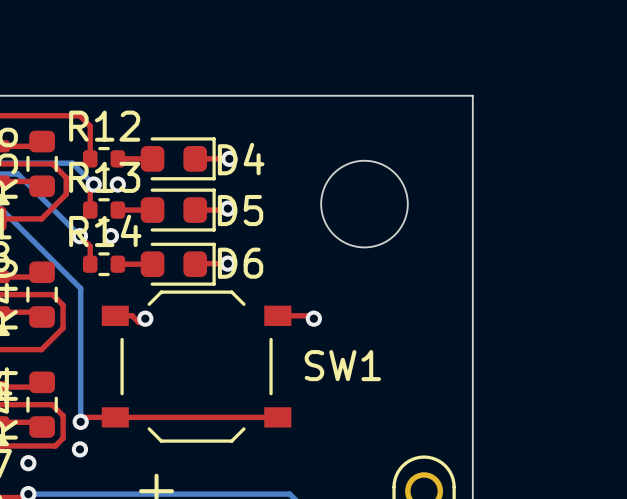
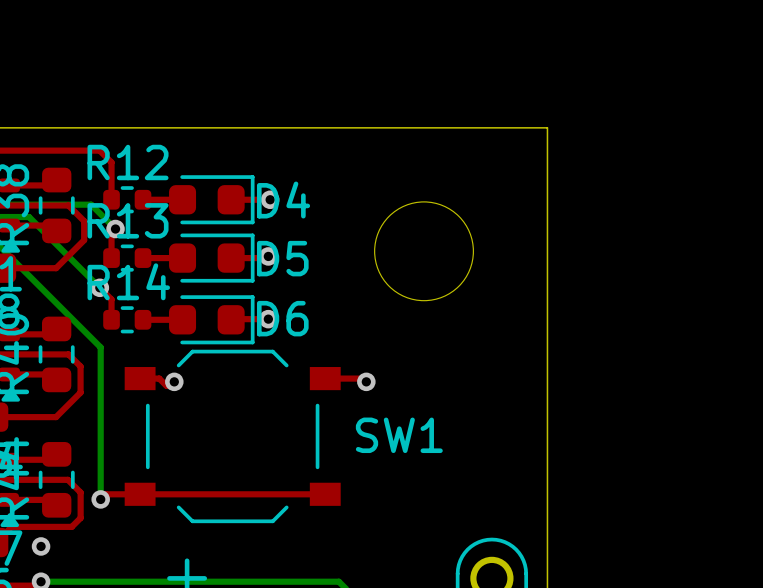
via: (117, 184) -> none
via: (110, 236) -> none
via: (79, 449) -> none

